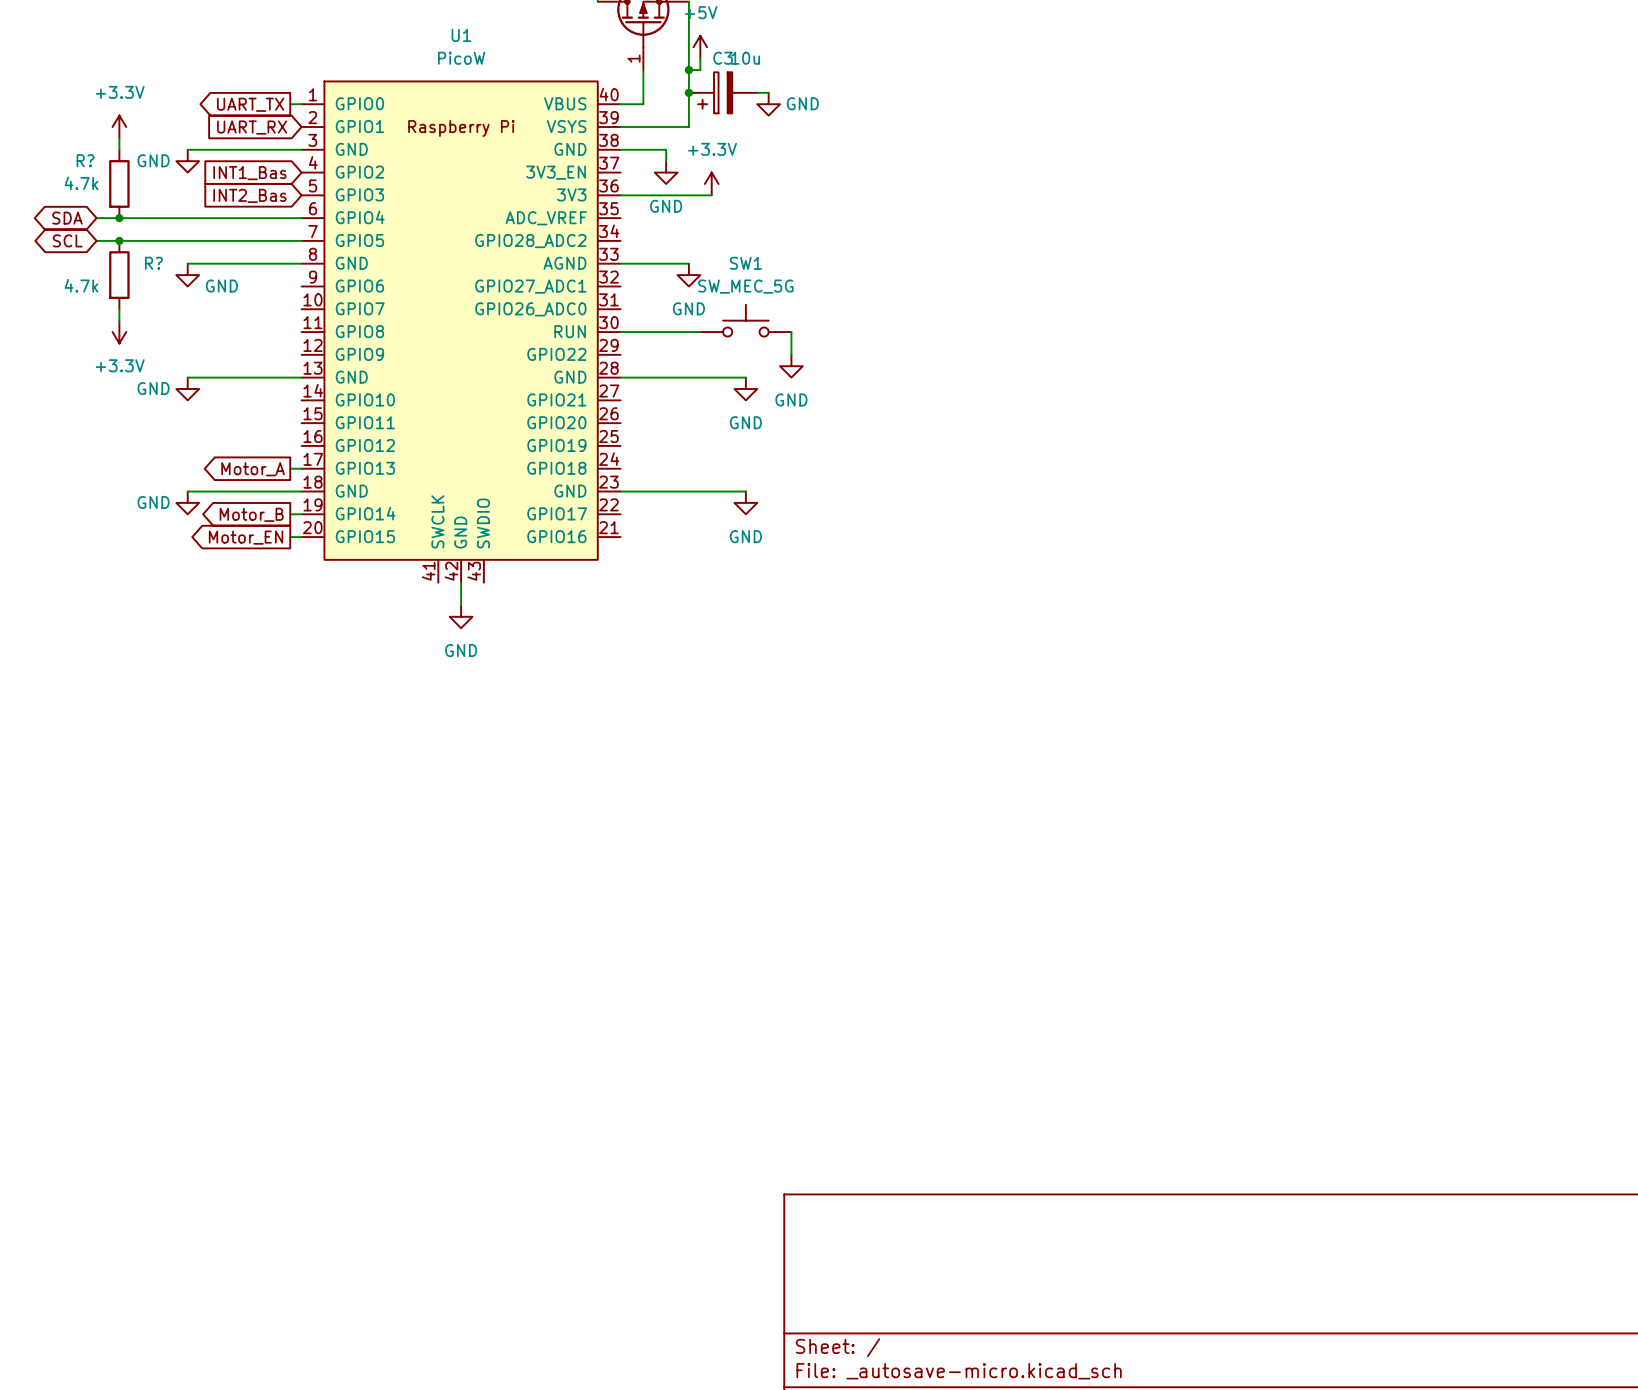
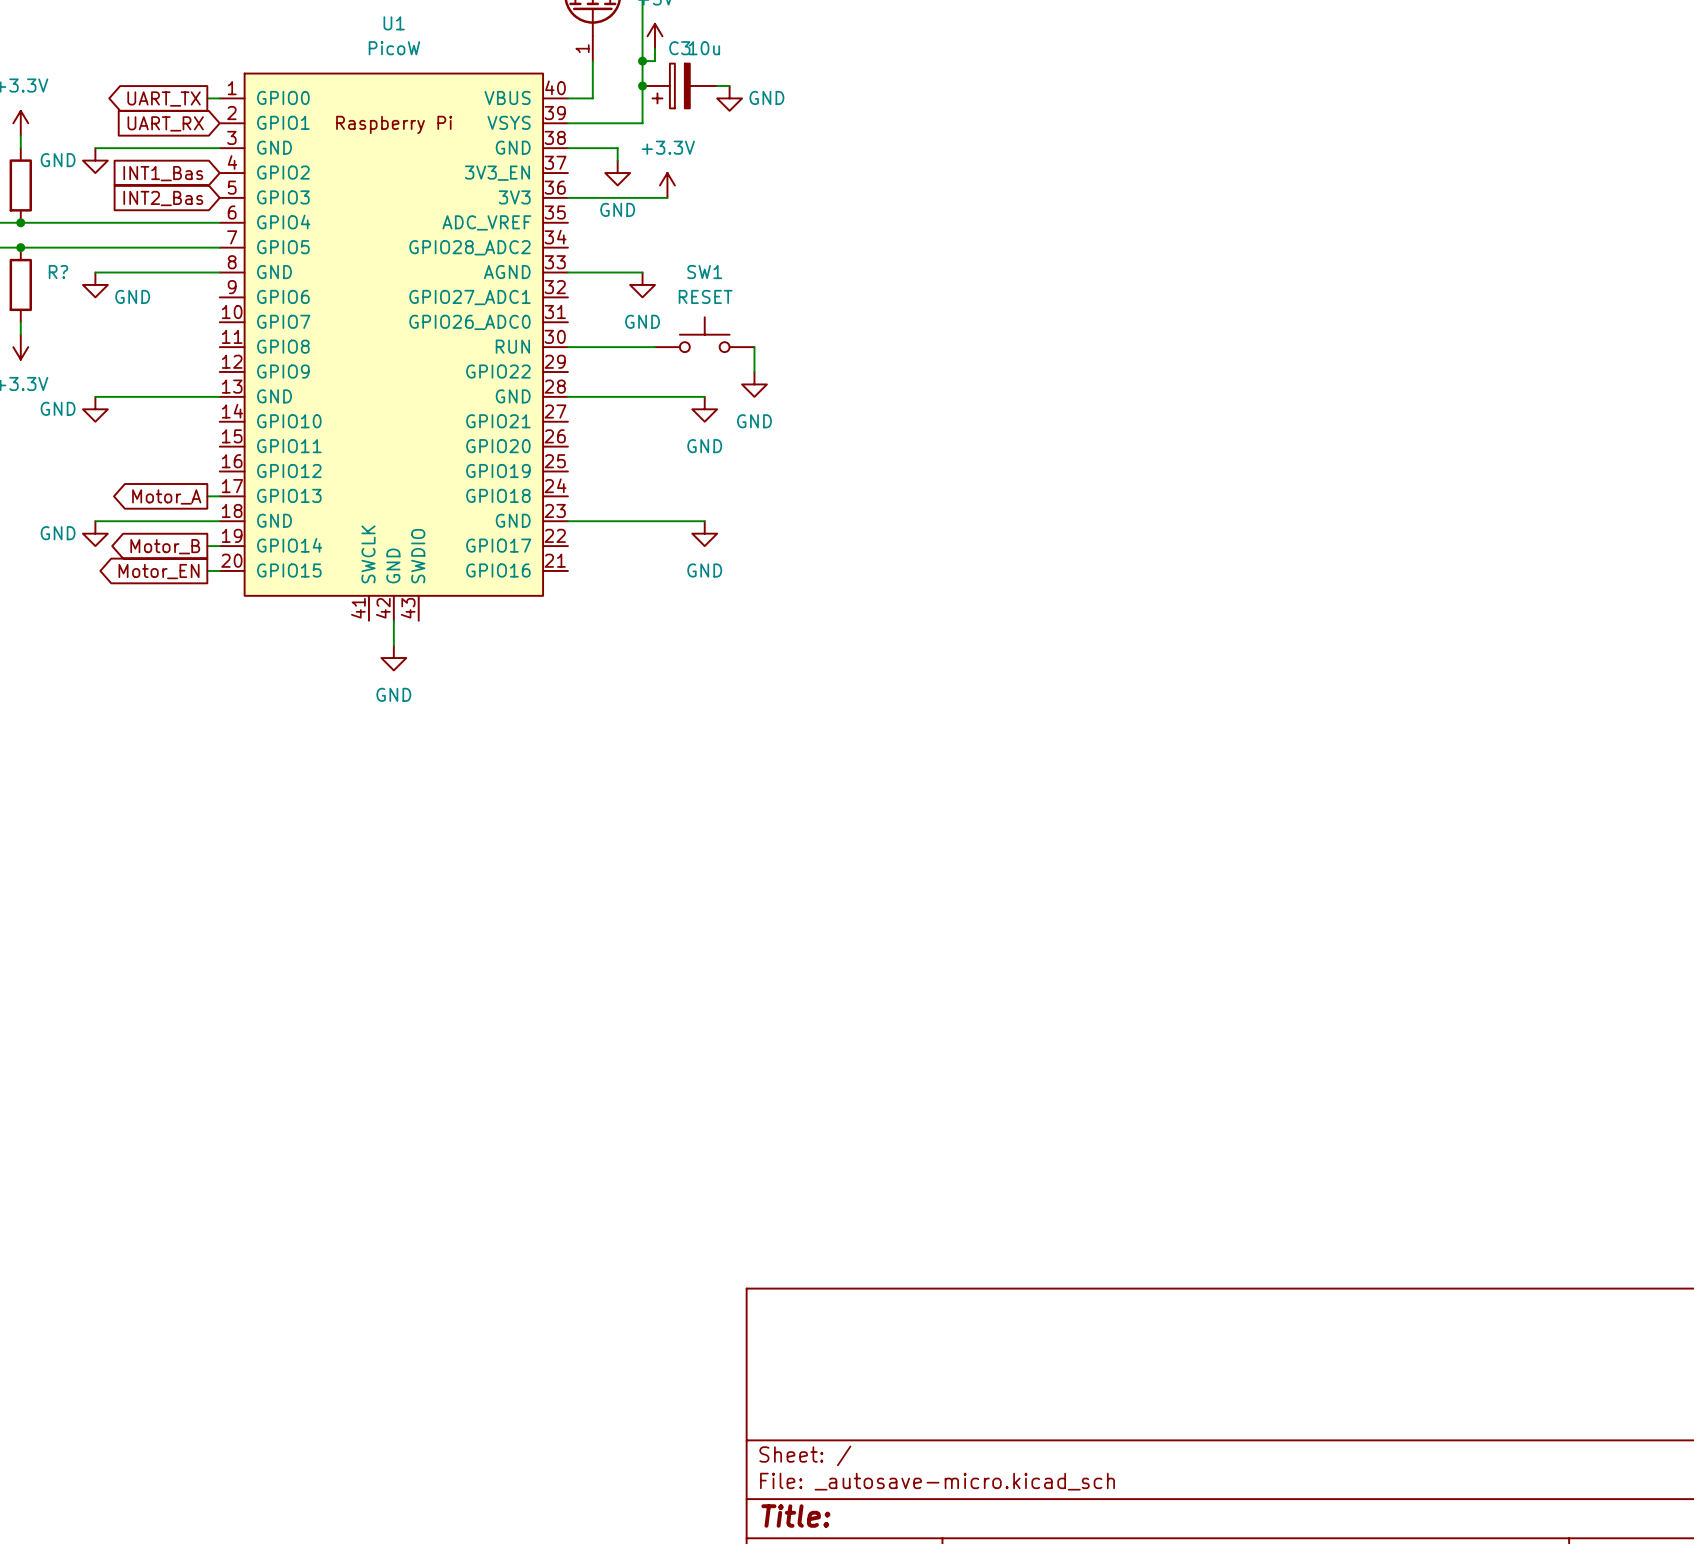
SW1 value: SW_MEC_5G (745, 286) -> RESET (705, 296)

